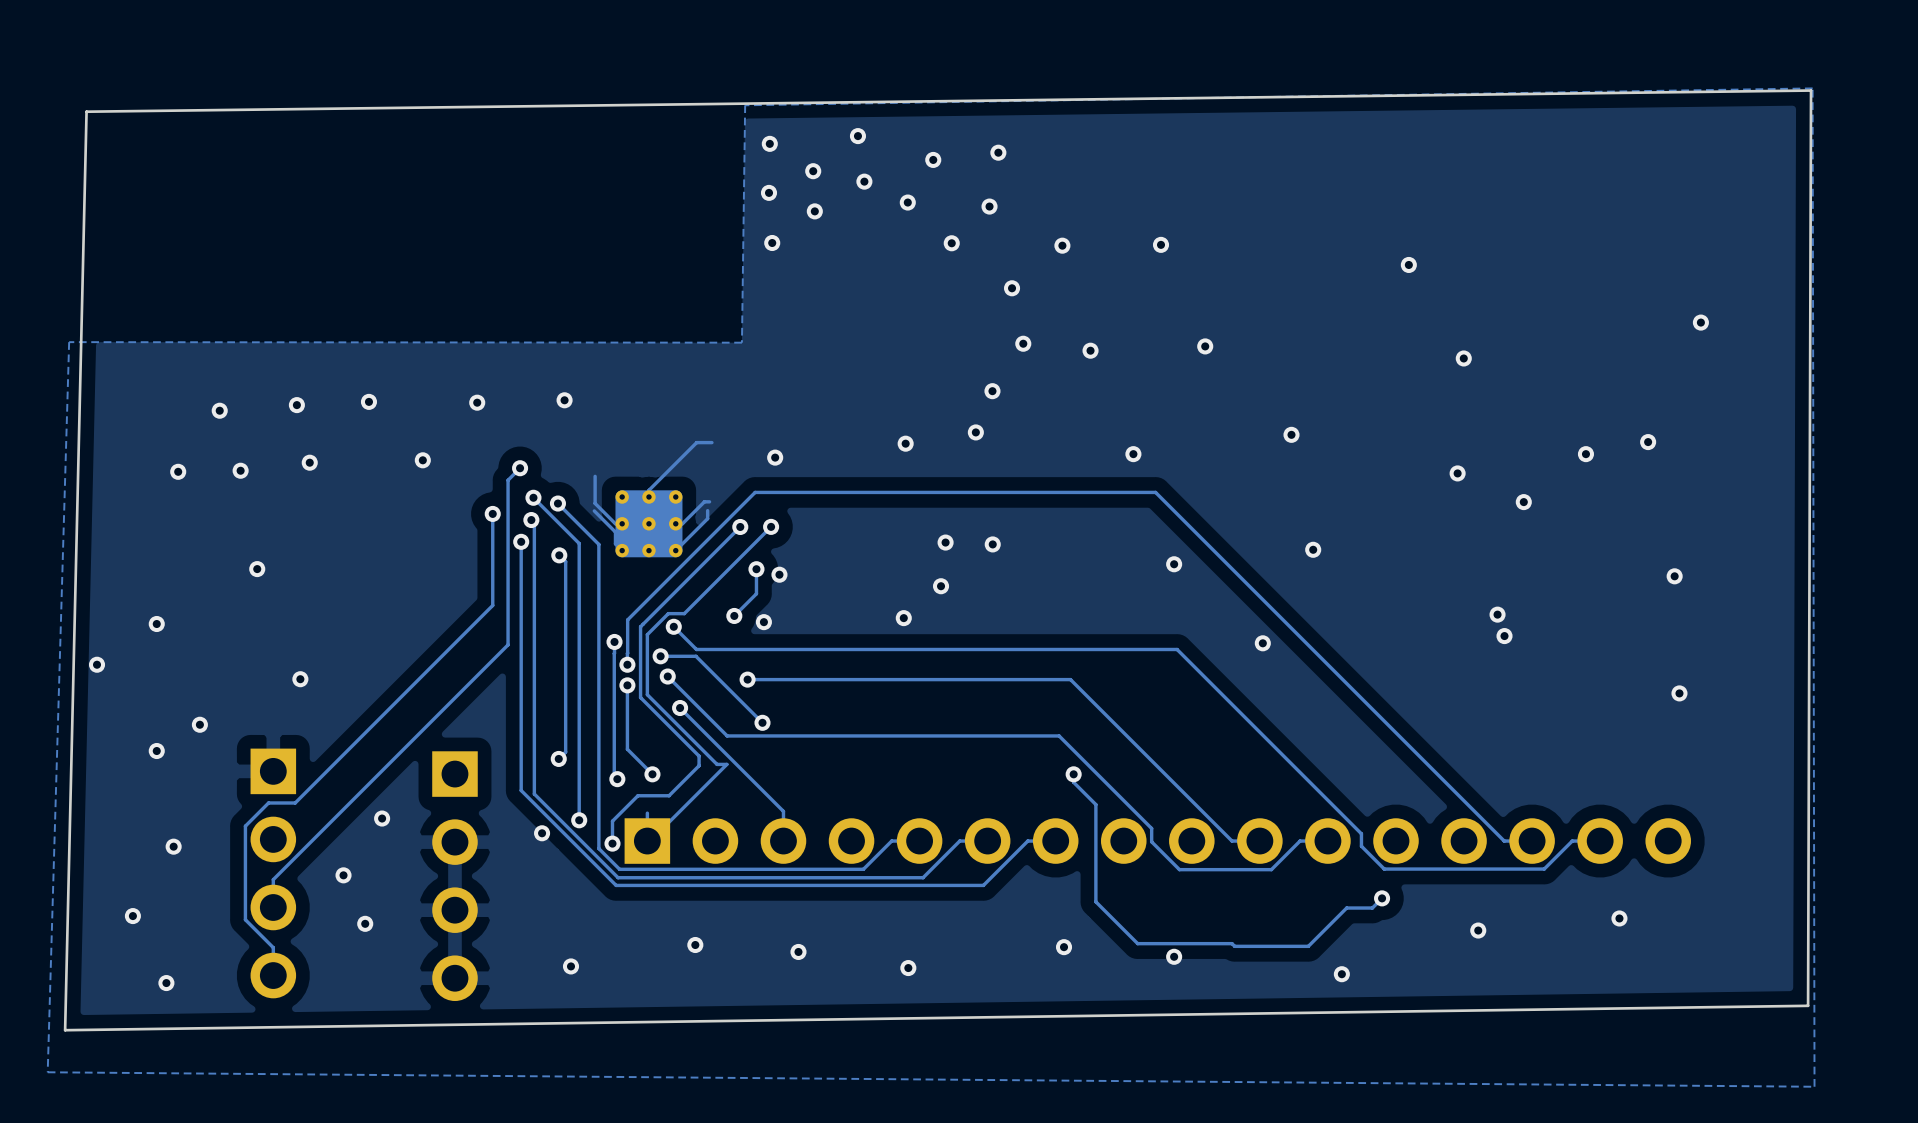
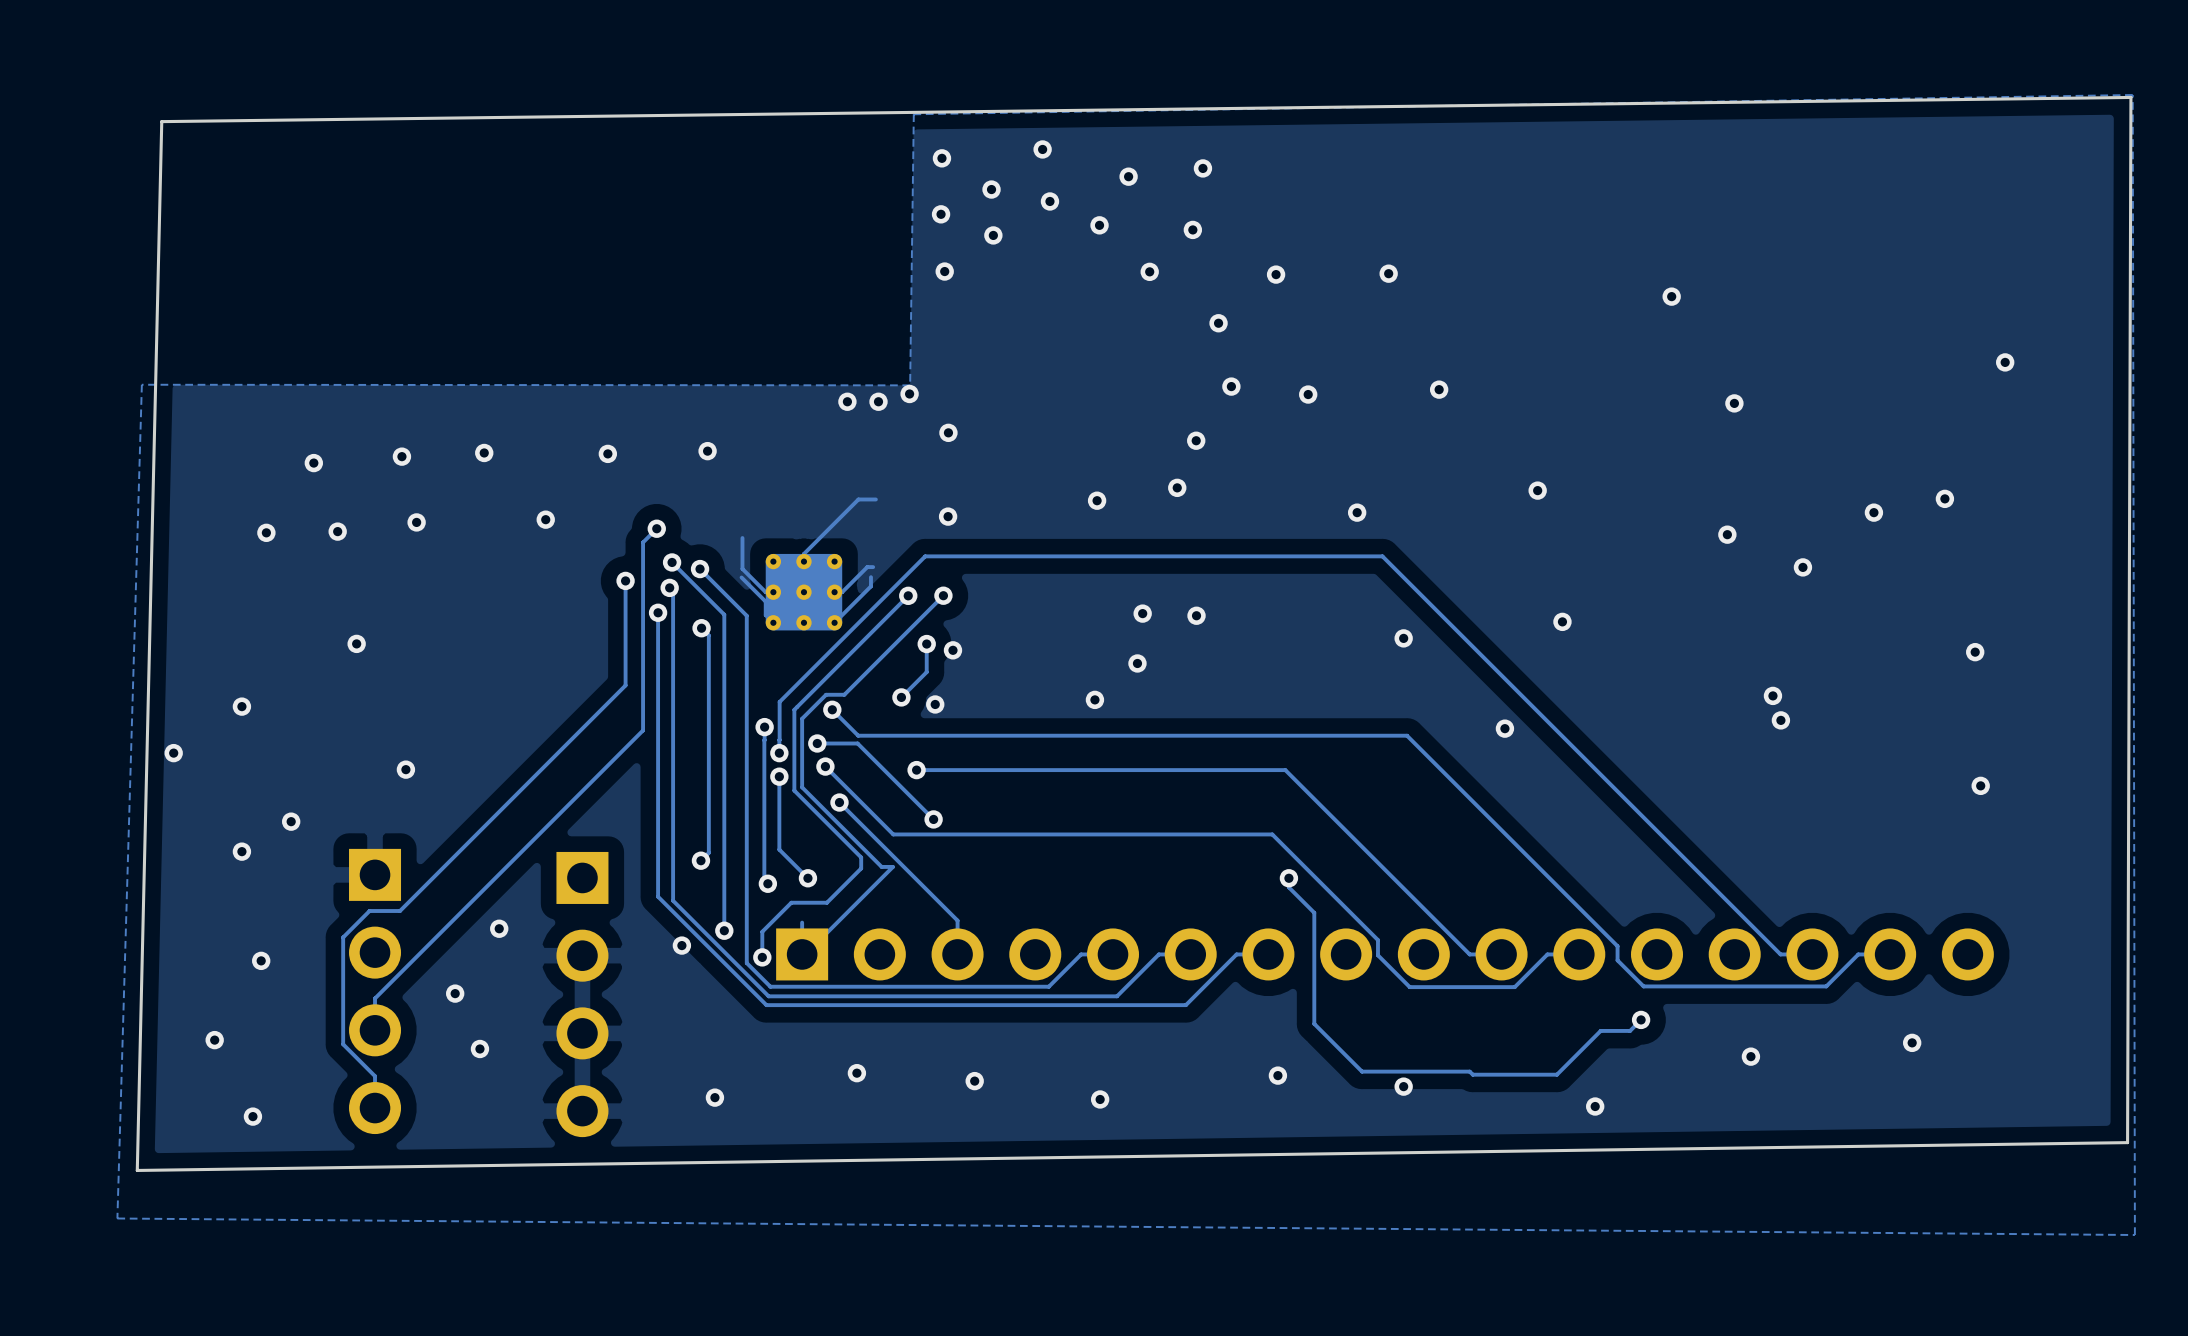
via: none -> (909, 393)
via: none -> (847, 401)
via: none -> (878, 401)
via: none -> (948, 432)

